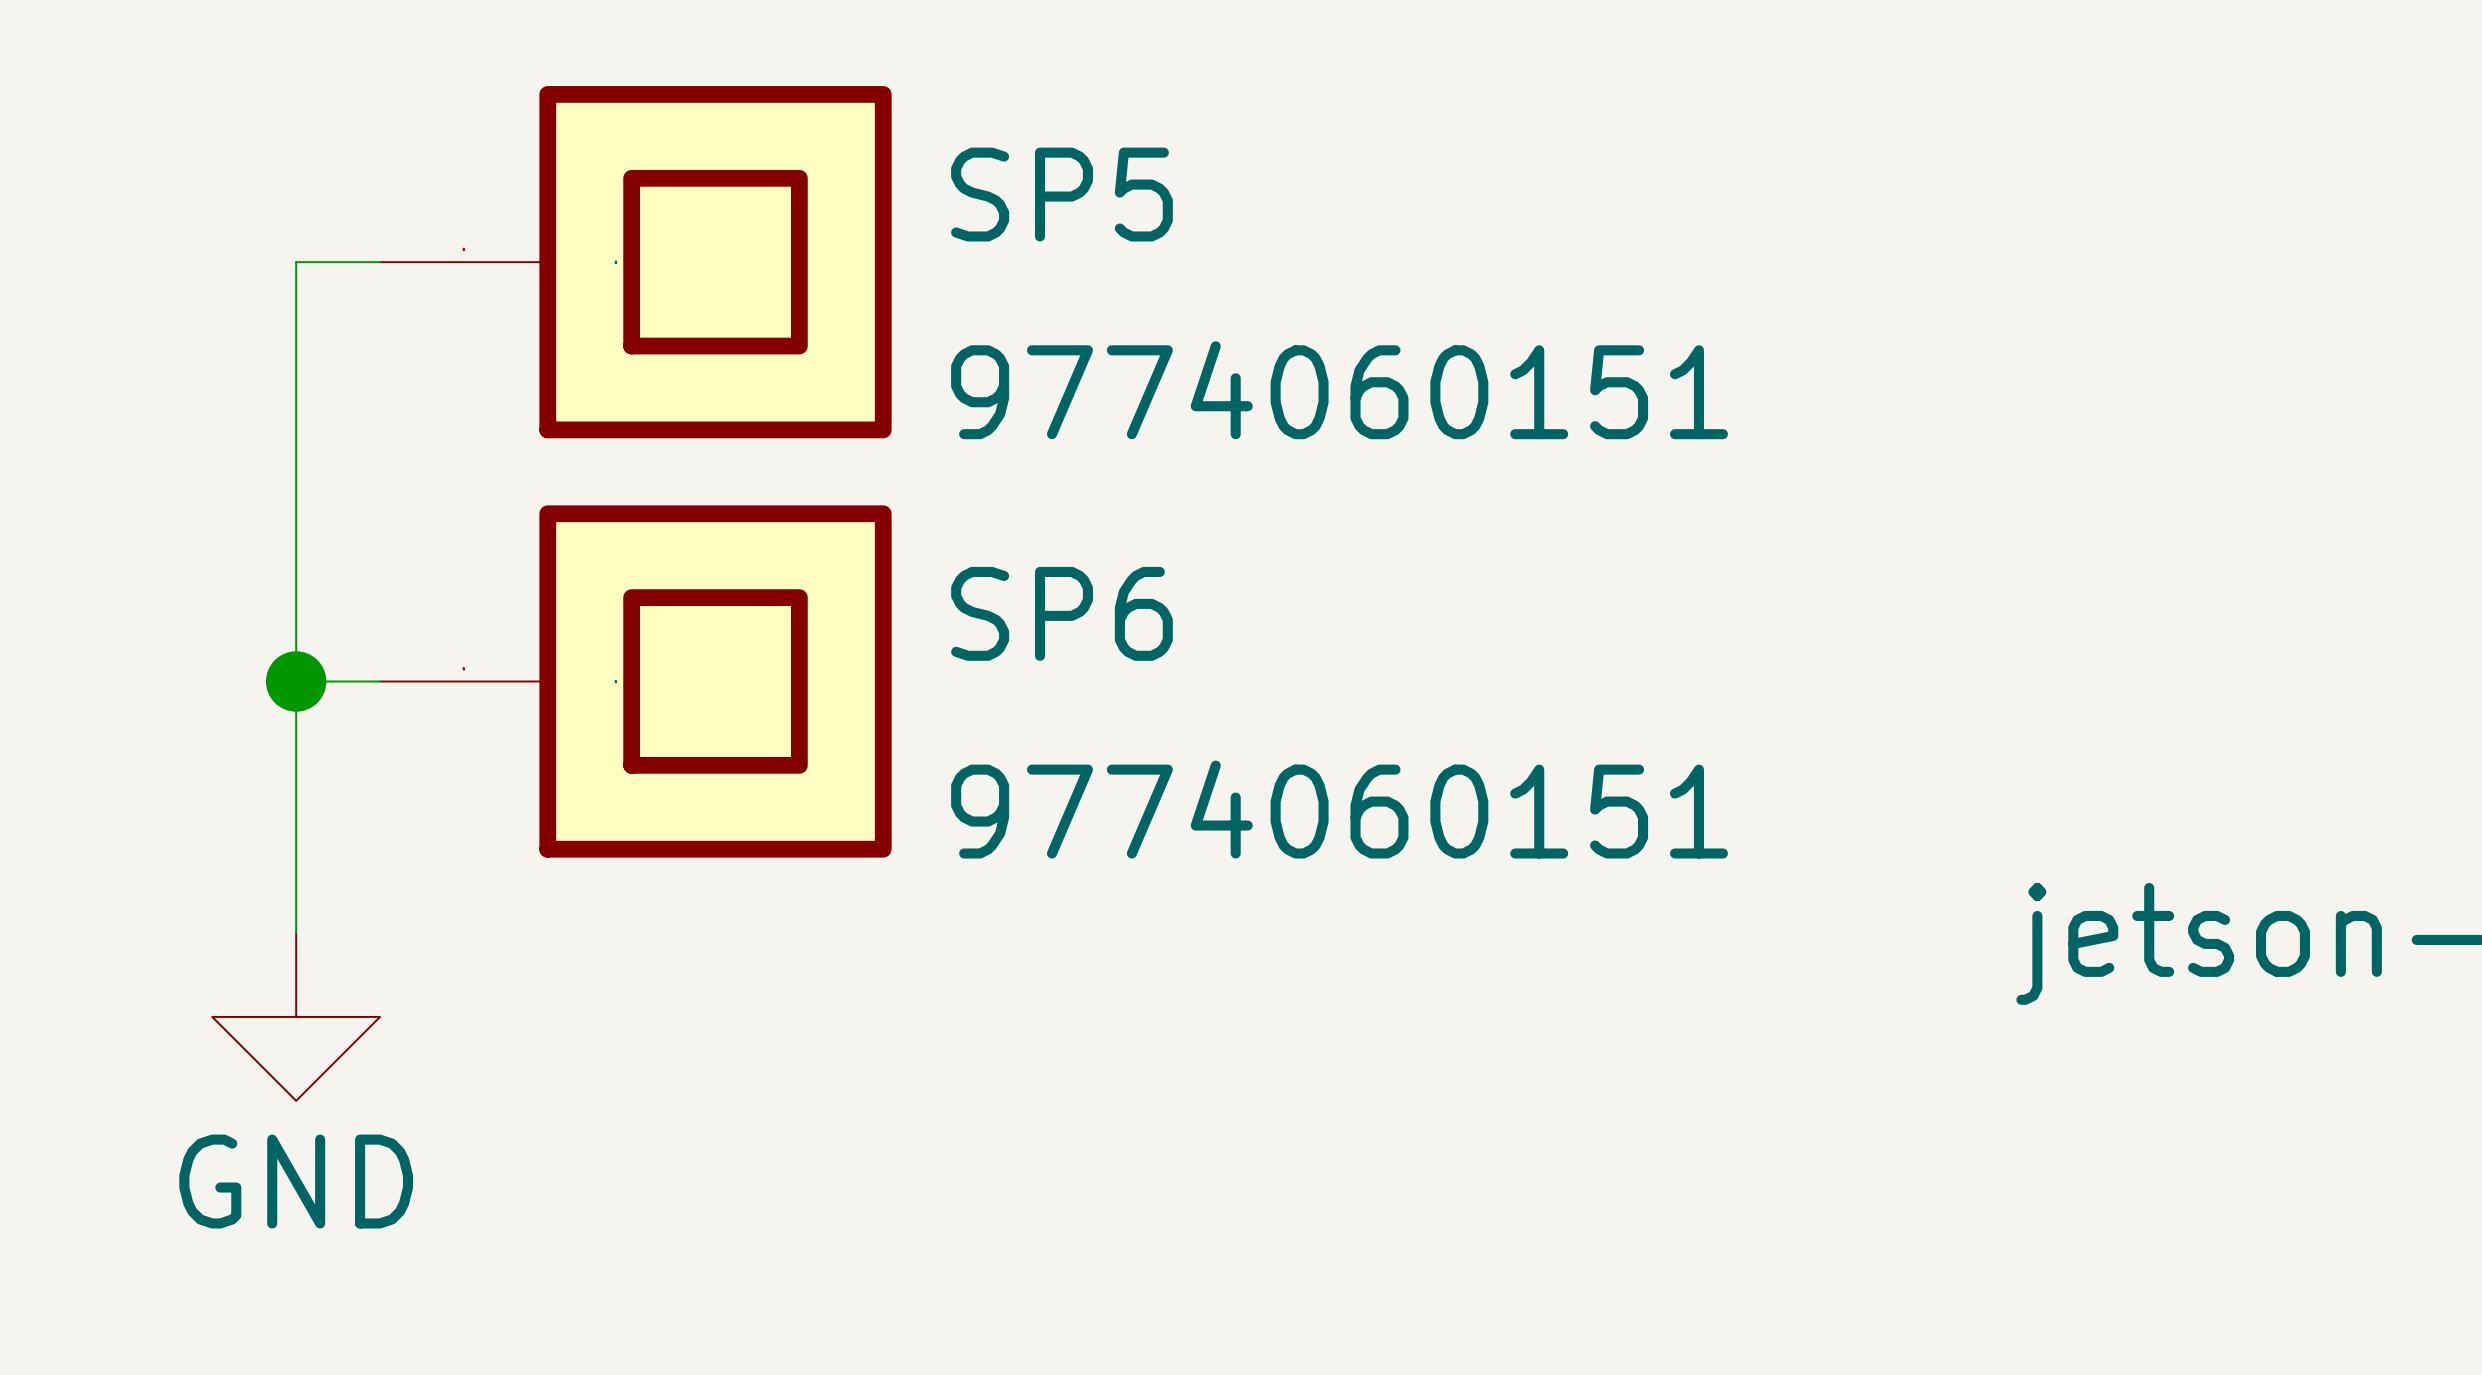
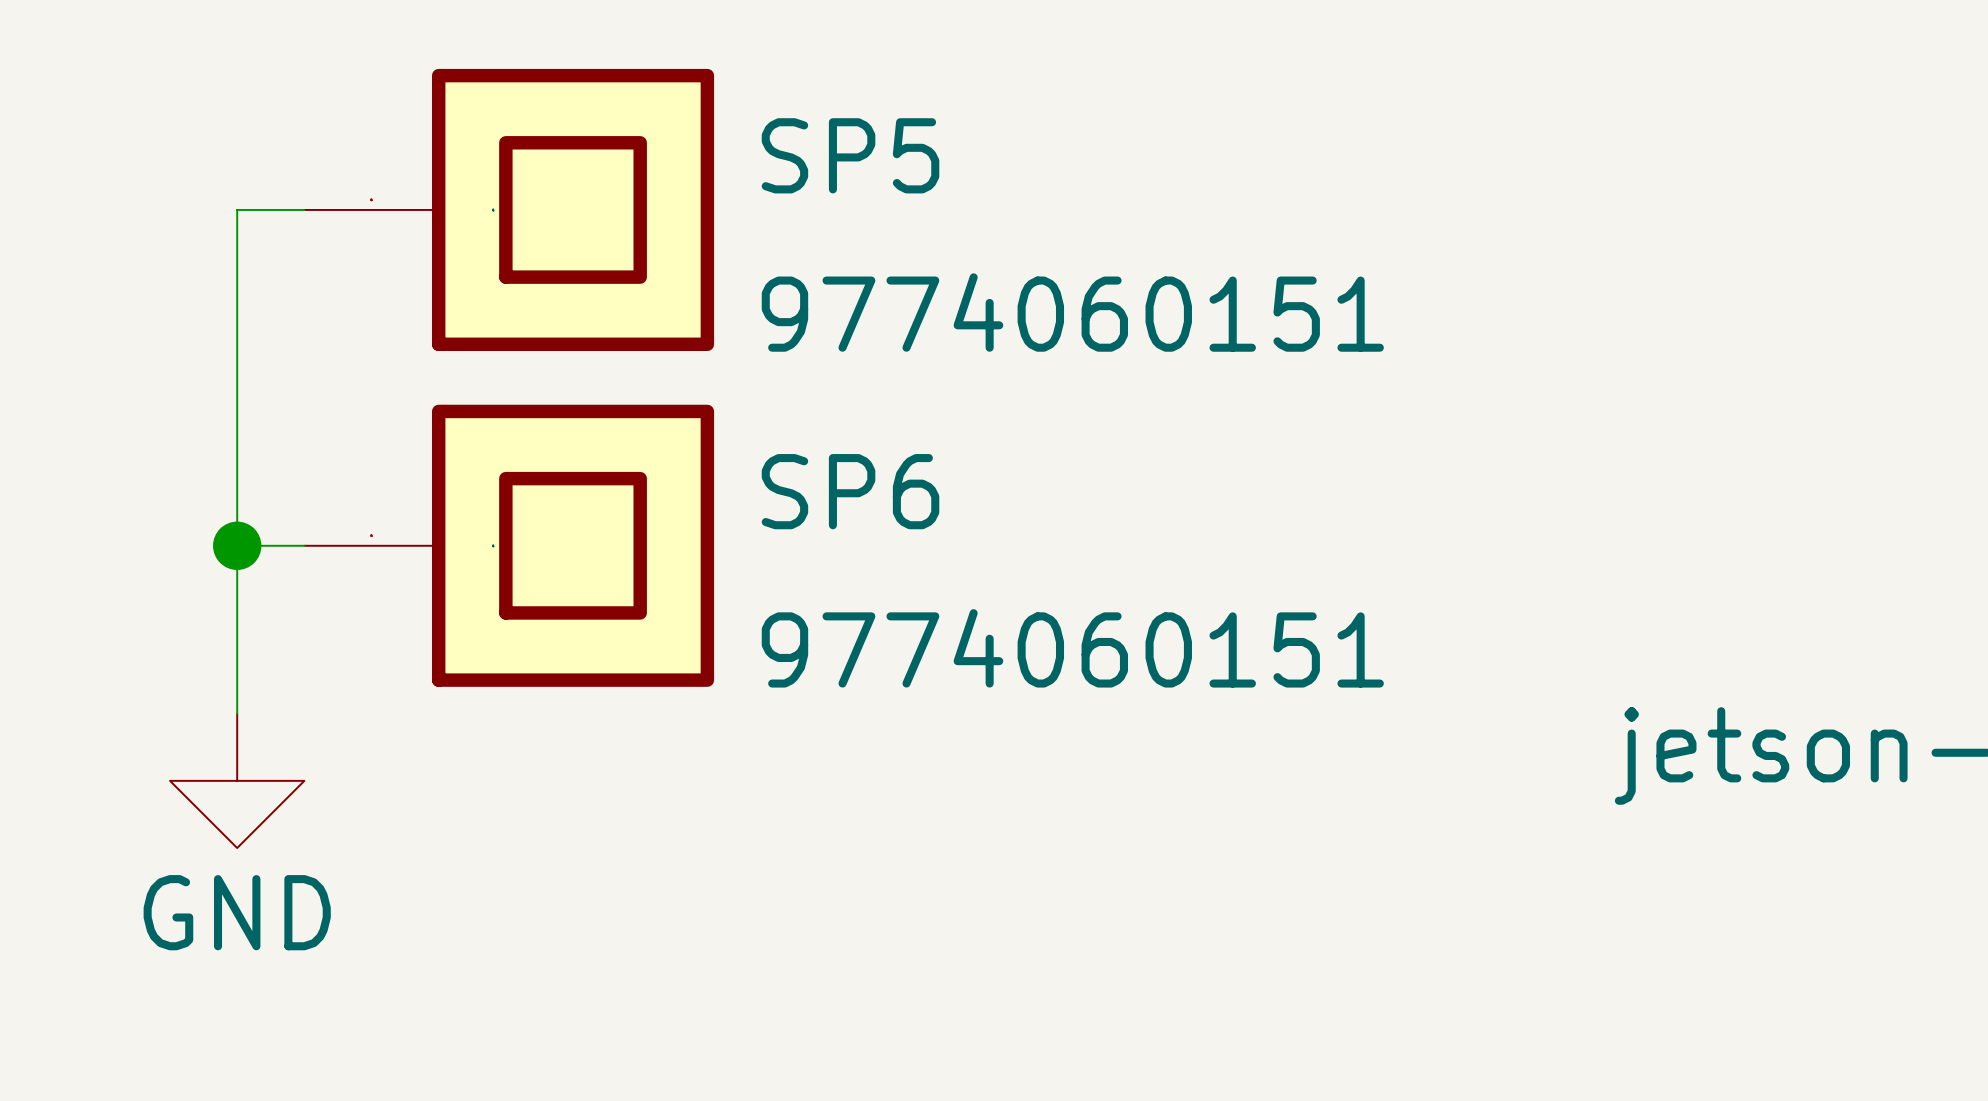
power symbol position: GND (296, 1016) -> GND (237, 780)

